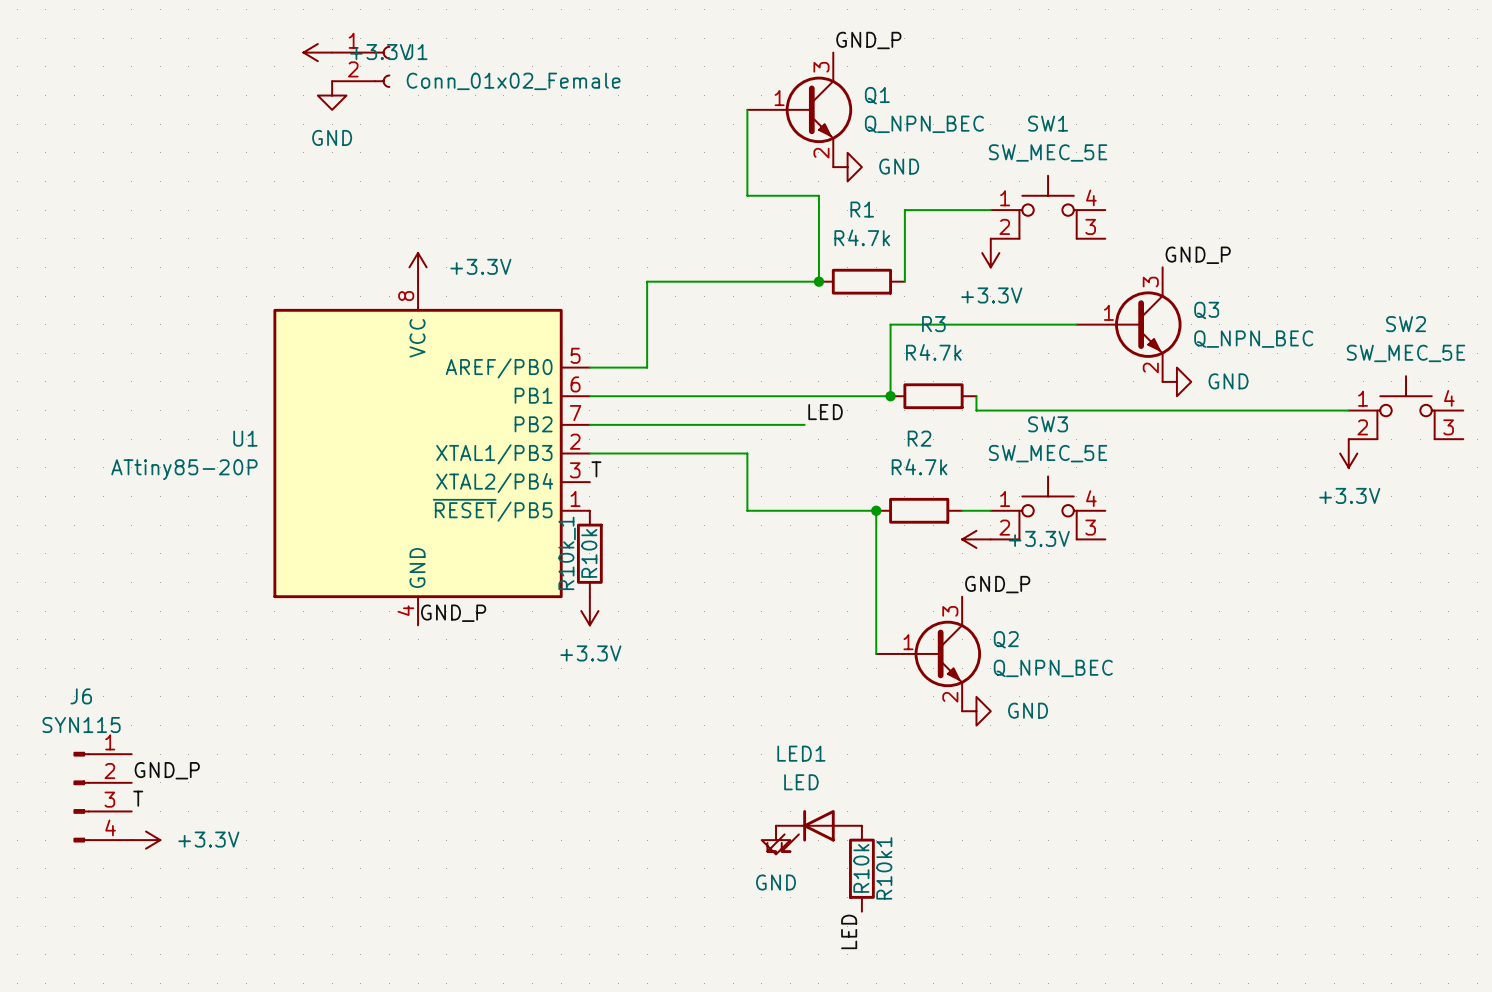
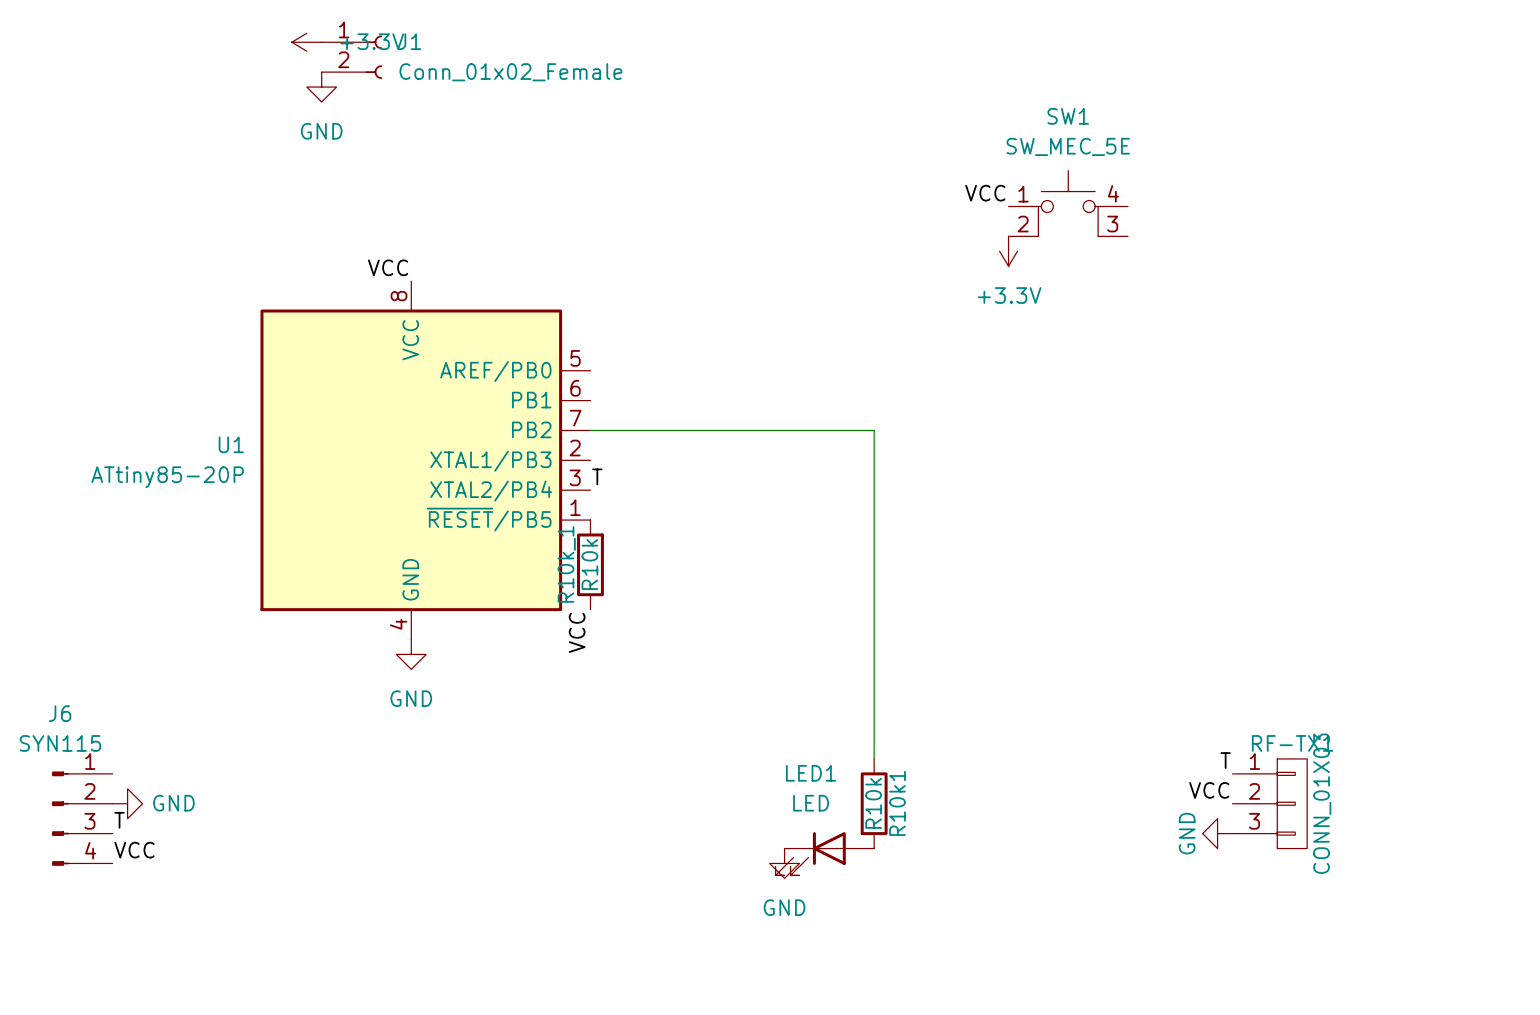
label: GND_P (868, 40) -> none
wire: (747, 109) (747, 195) (818, 195) (818, 281) (647, 281) (647, 367) (589, 367) -> none
Q1: Q_NPN_BEC (799, 109) -> none
power symbol: GND (847, 167) -> none
label: none -> VCC (985, 193)
wire: (990, 210) (904, 210) (904, 281) -> none
label: GND_P (1198, 255) -> none
power symbol: +3.3V (418, 267) -> none
label: none -> VCC (388, 267)
junction: (818, 281) -> none
R1: R4.7k (861, 281) -> none
wire: (1076, 324) (890, 324) (890, 396) (589, 396) -> none
Q3: Q_NPN_BEC (1129, 324) -> none
power symbol: GND (1176, 381) -> none
junction: (890, 396) -> none
R3: R4.7k (933, 396) -> none
wire: (976, 396) (976, 410) (1348, 410) -> none
SW2: SW_MEC_5E (1406, 407) -> none
label: LED (825, 412) -> none
wire: none -> (814, 430) (874, 430) (874, 758)
wire: (589, 453) (747, 453) (747, 510) (876, 510) (876, 653) -> none
power symbol: +3.3V (1348, 453) -> none
SW3: SW_MEC_5E (1048, 507) -> none
junction: (876, 510) -> none
R2: R4.7k (919, 510) -> none
wire: (962, 510) (990, 510) -> none
power symbol: +3.3V (976, 539) -> none
label: GND_P (997, 584) -> none
power symbol: +3.3V (589, 611) -> none
label: GND_P (453, 613) -> none
label: none -> VCC (577, 632)
power symbol: none -> GND (411, 654)
Q2: Q_NPN_BEC (928, 653) -> none
power symbol: GND (976, 711) -> none
label: none -> T (1225, 760)
label: GND_P (167, 770) -> none
label: none -> VCC (1209, 790)
power symbol: none -> GND (127, 803)
RF-TX1: none -> CONN_01X03 (1269, 803)
power symbol: none -> GND (1217, 833)
label: none -> VCC (134, 850)
power symbol: +3.3V (145, 840) -> none
R10k1 position: (861, 868) -> (874, 803)
label: LED (849, 931) -> none

